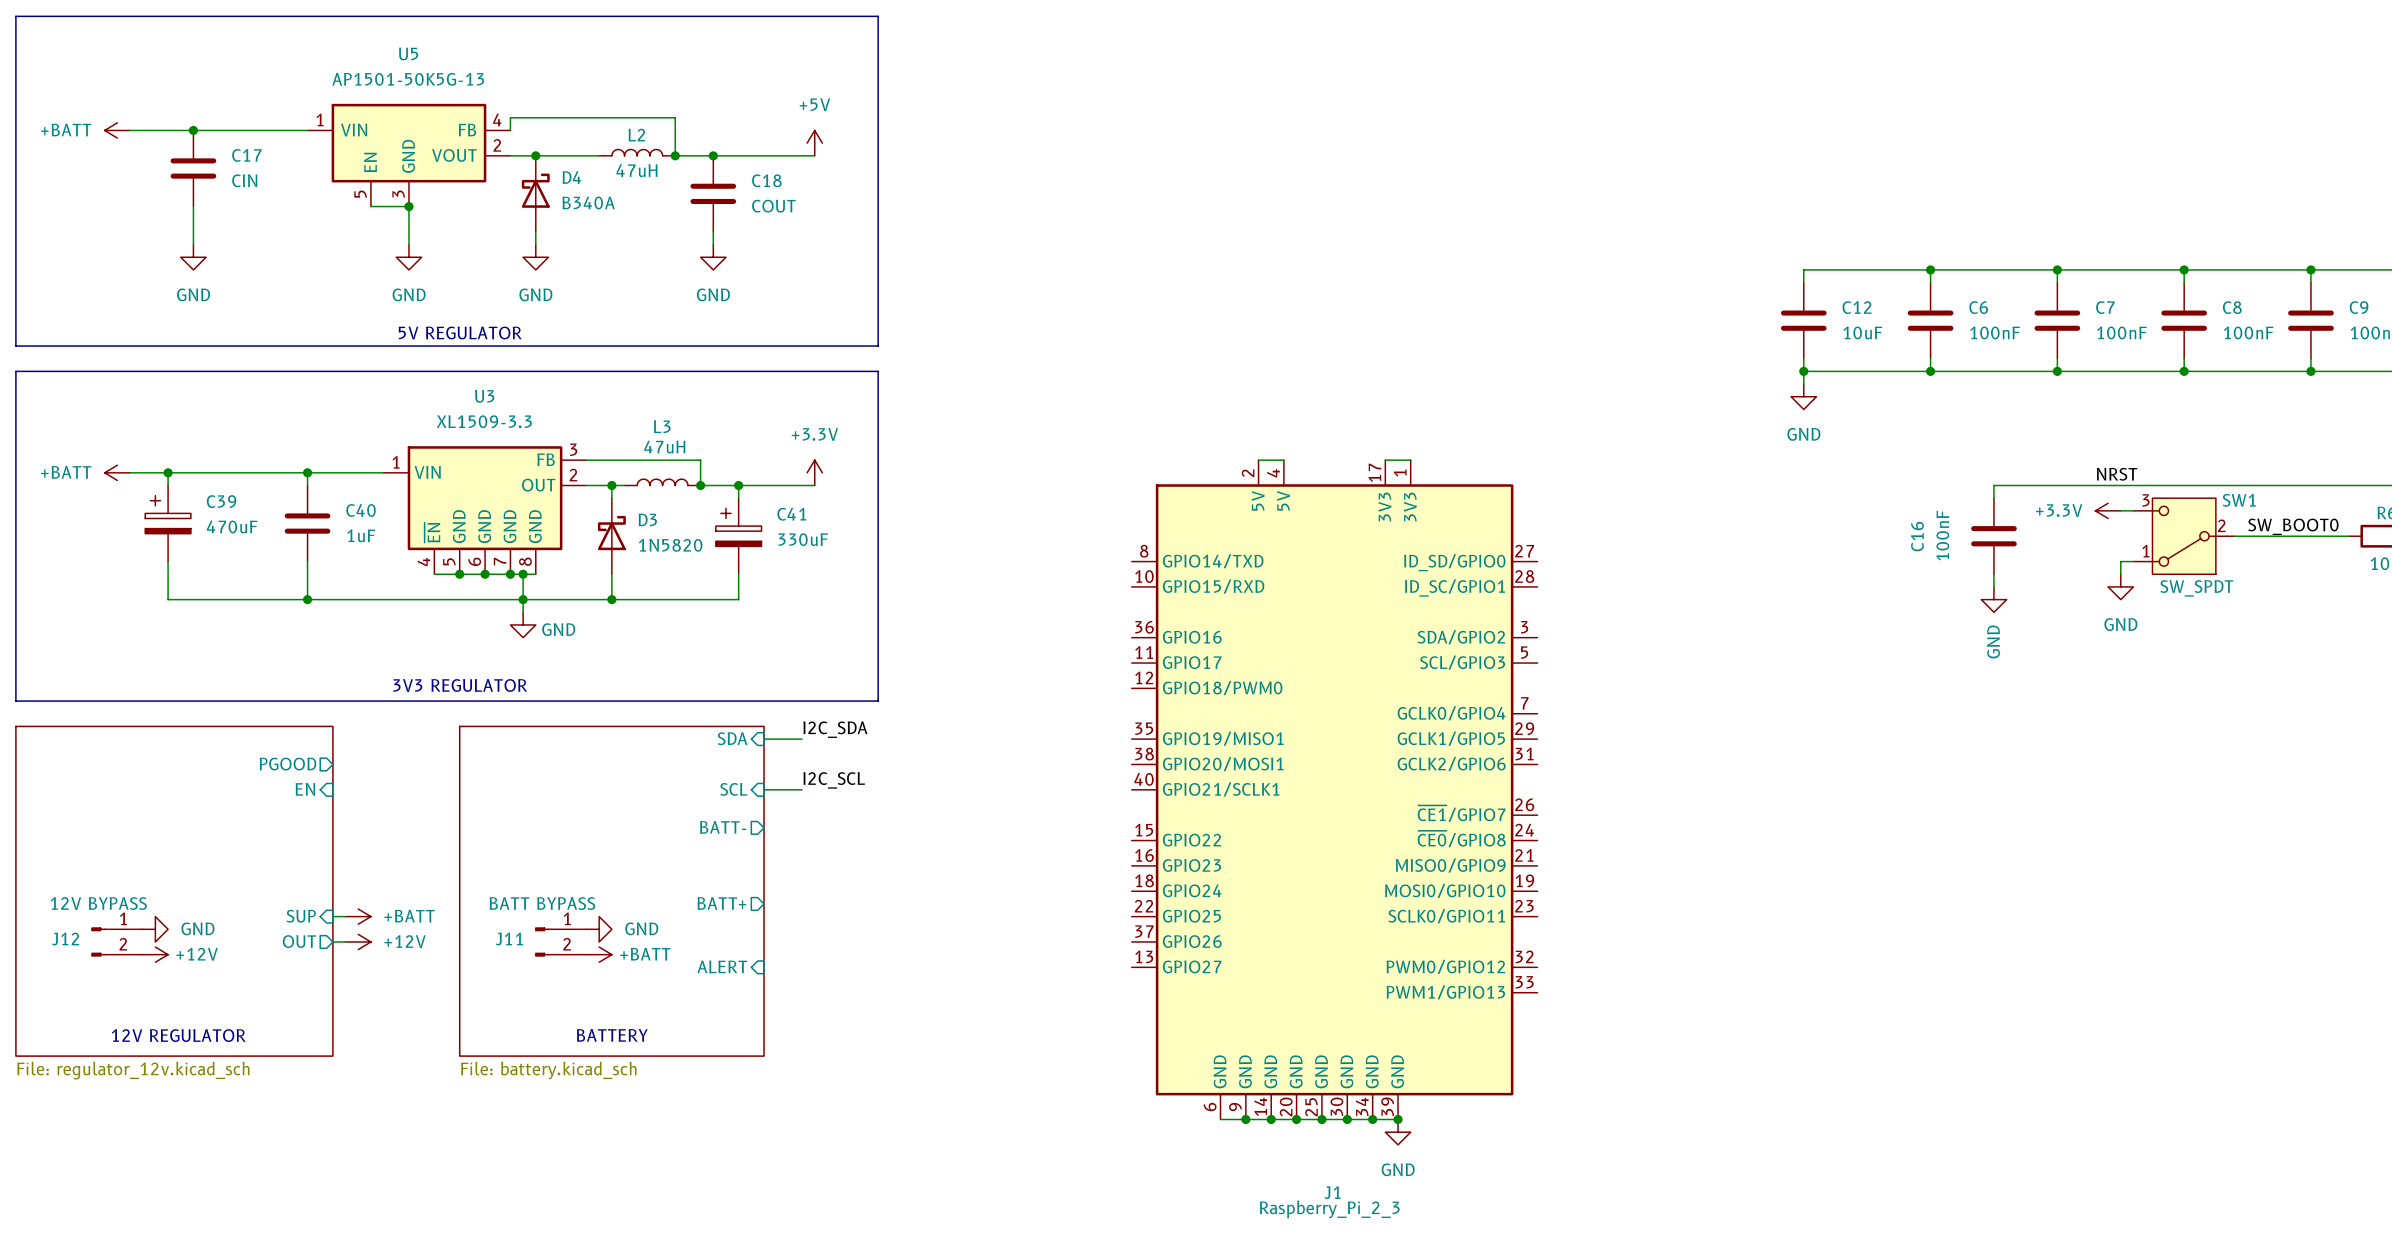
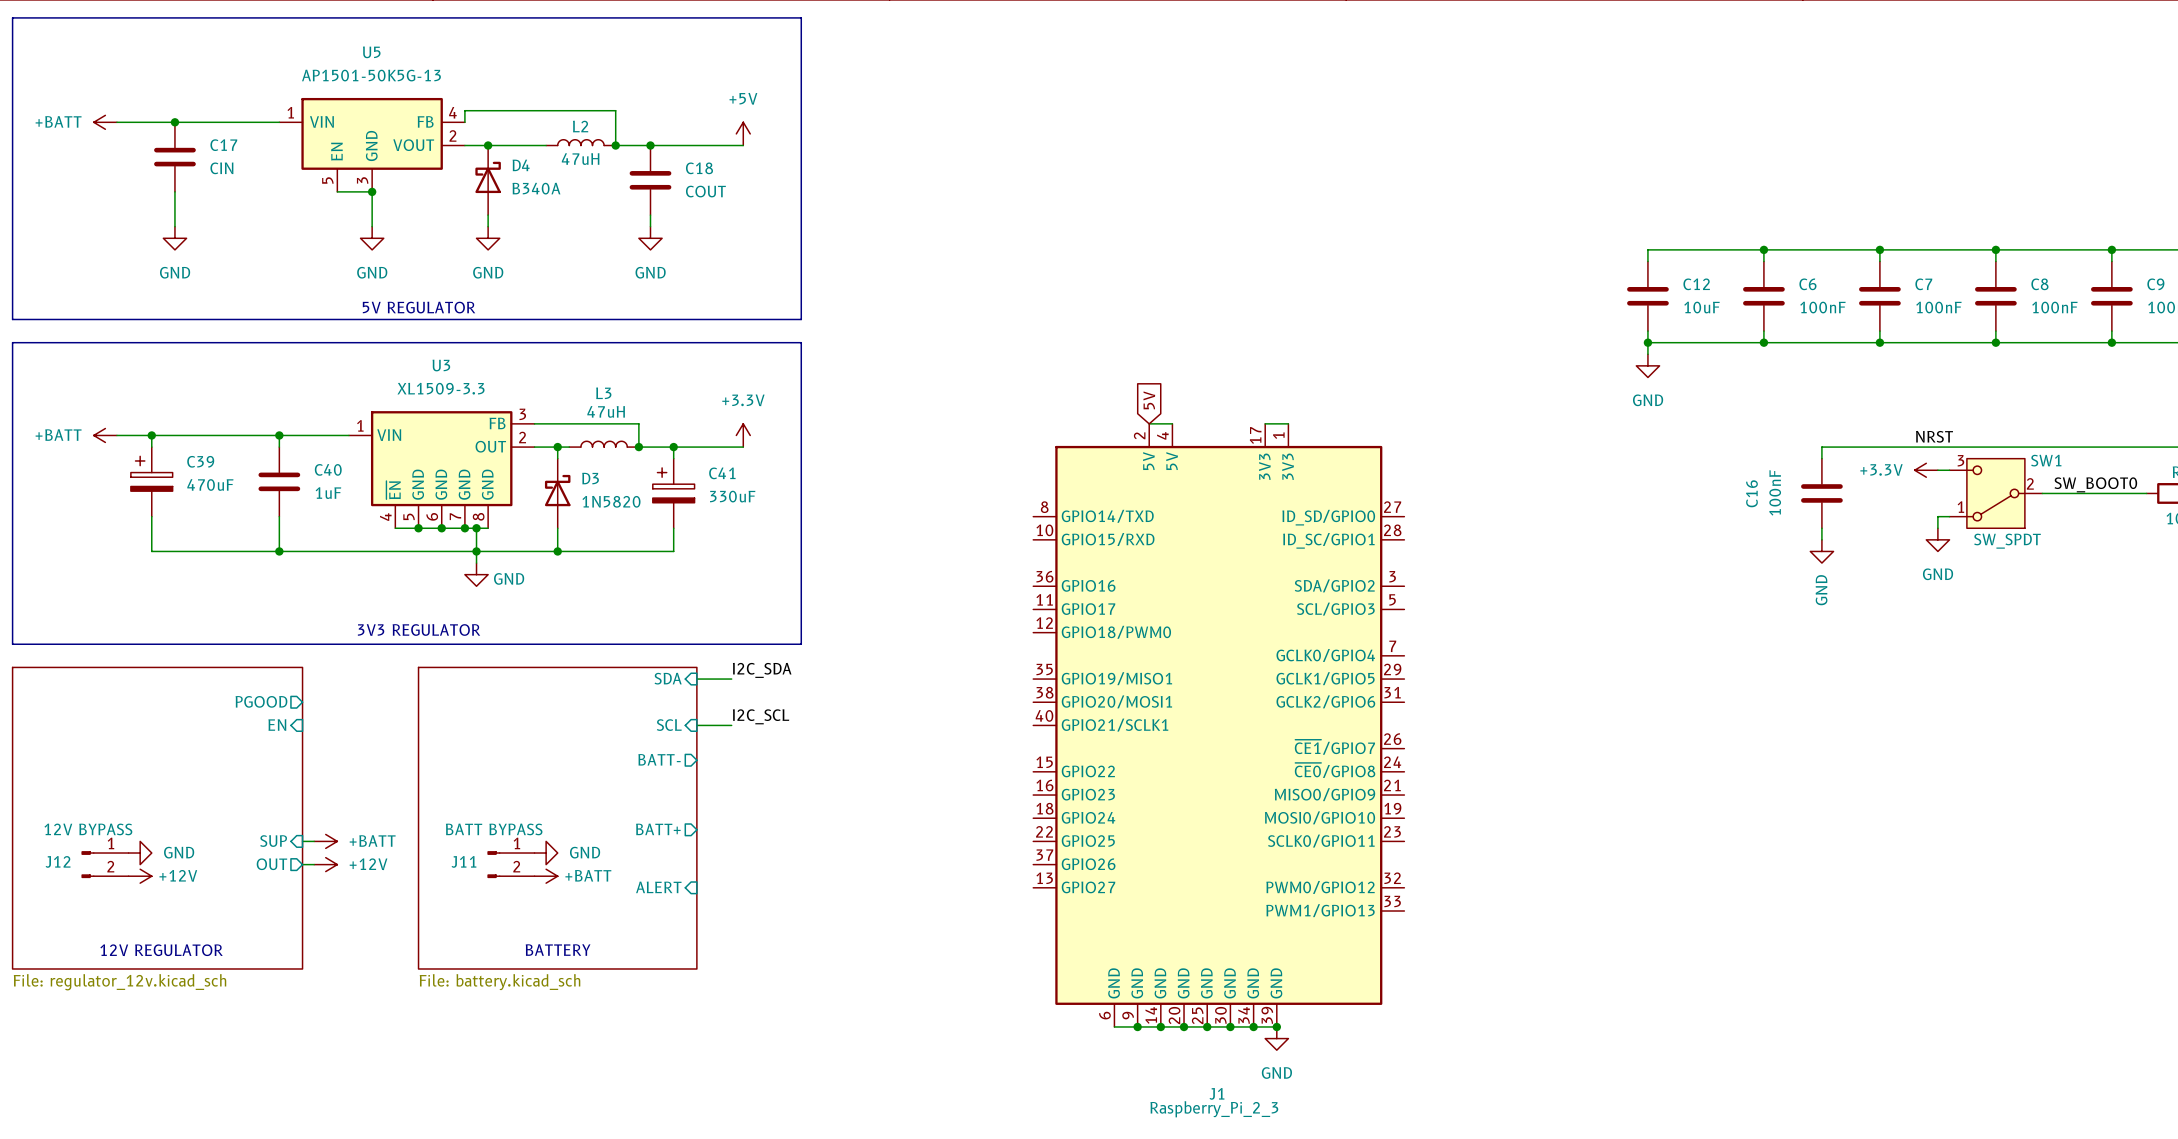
global label: none -> 5V (1149, 400)

